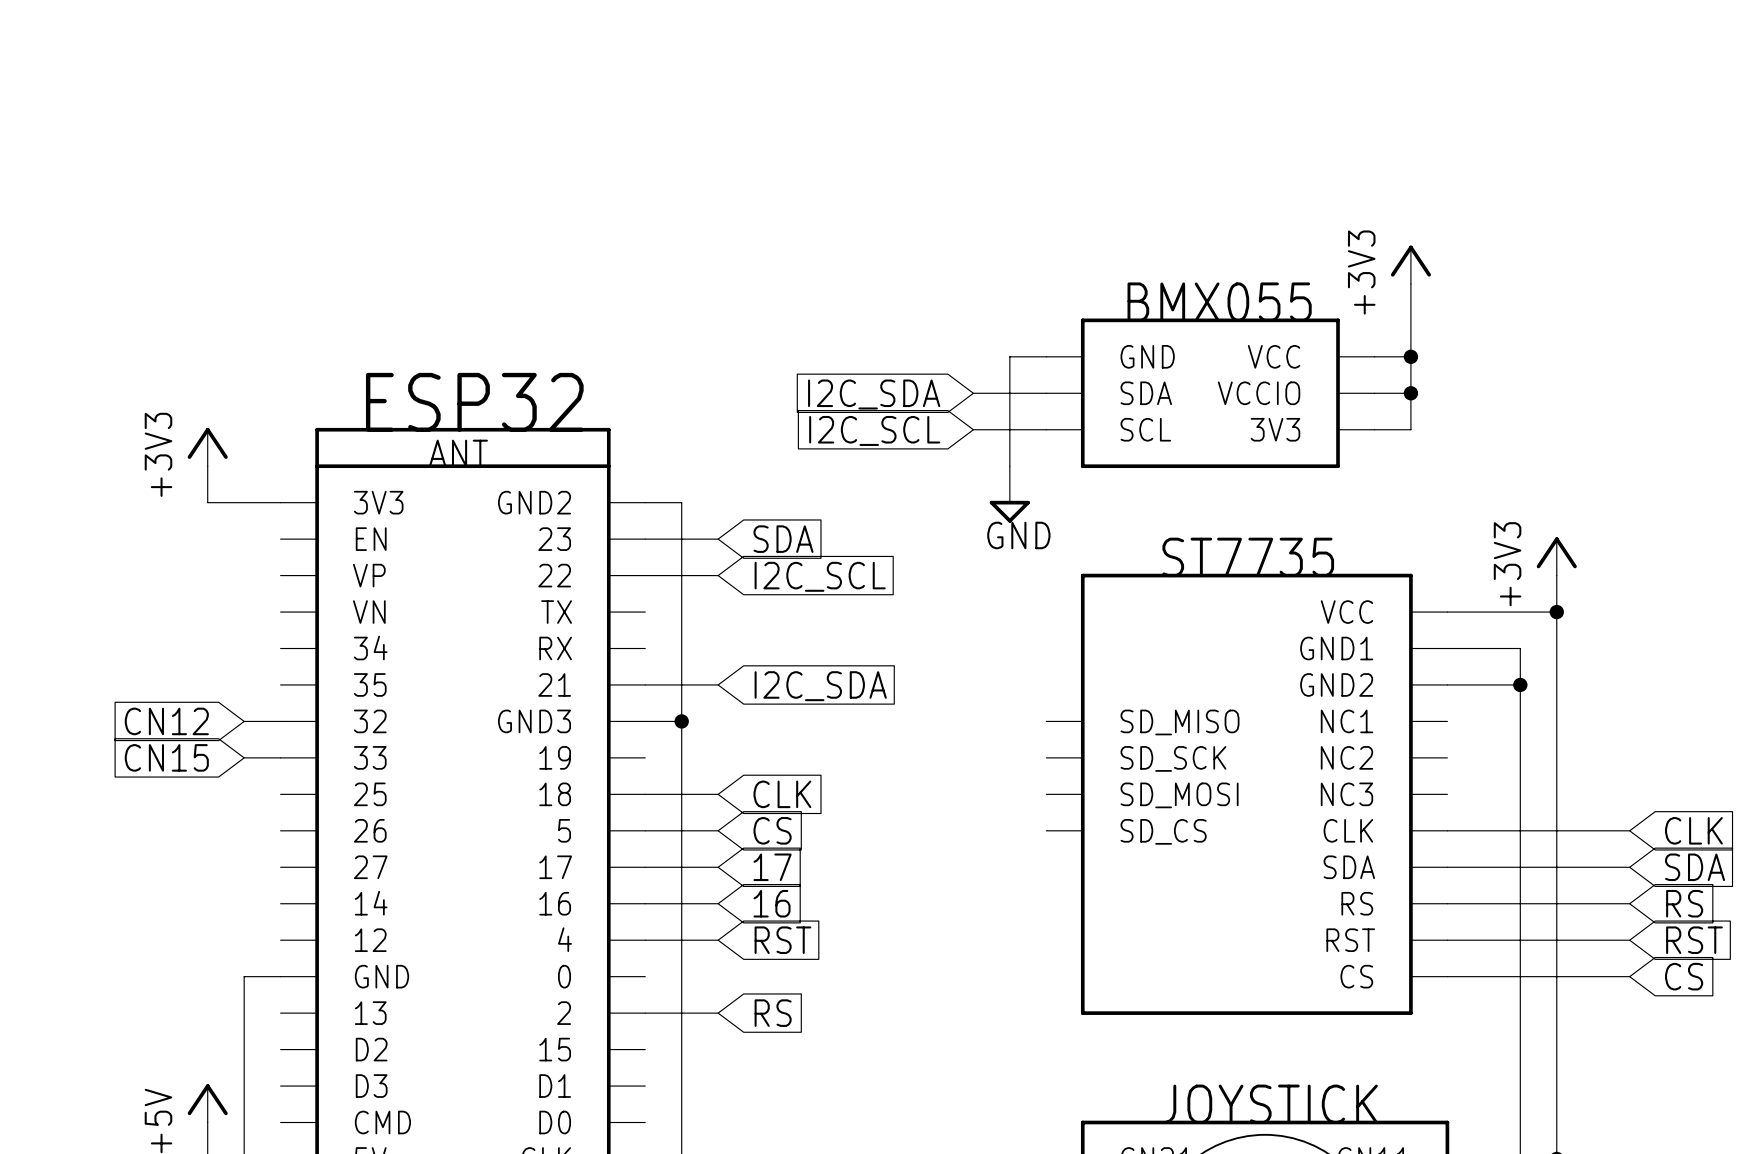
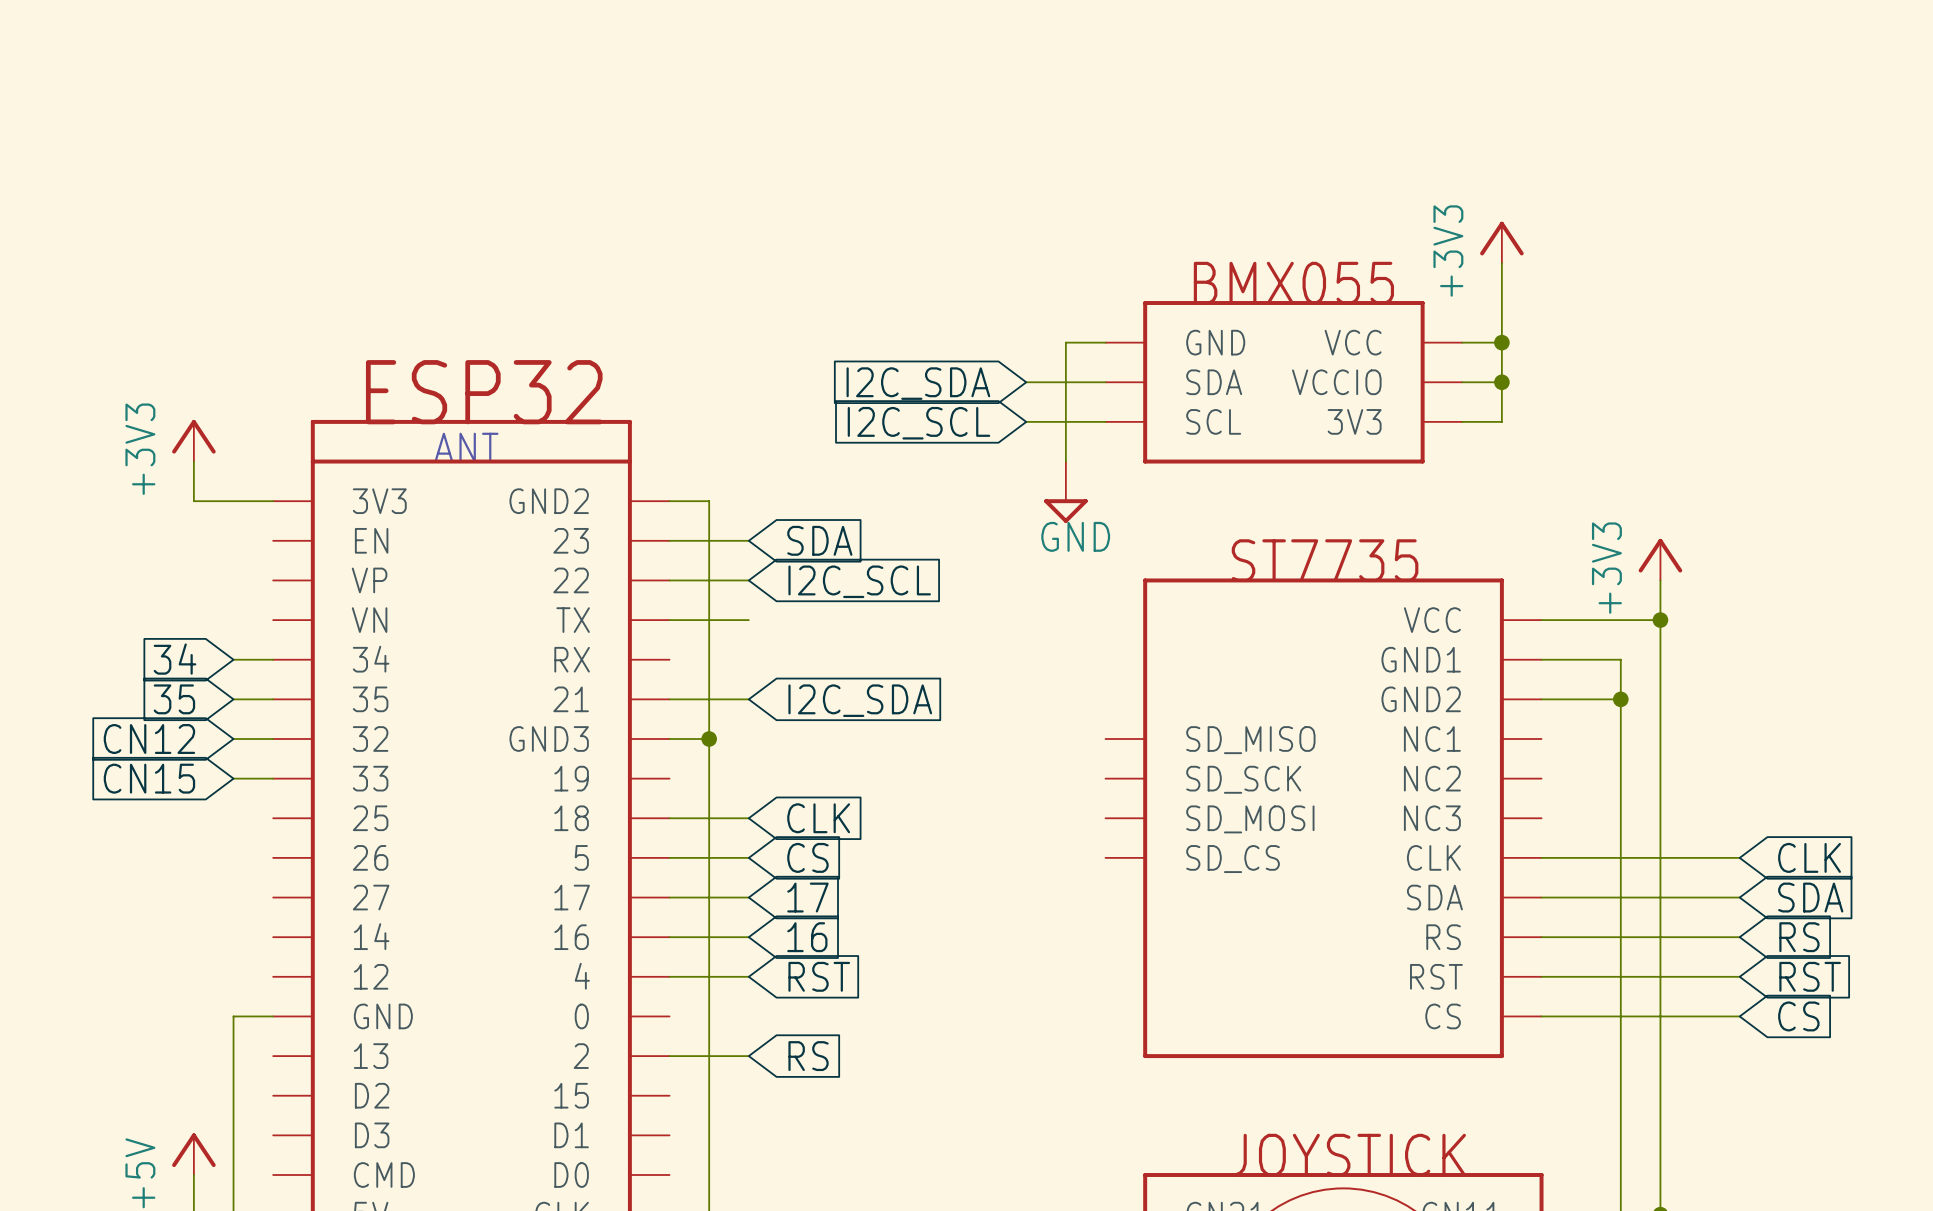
wire: none -> (669, 620) (748, 620)
global label: none -> 34 (175, 659)
wire: none -> (233, 659) (273, 659)
global label: none -> 35 (174, 699)
wire: none -> (233, 699) (273, 699)

